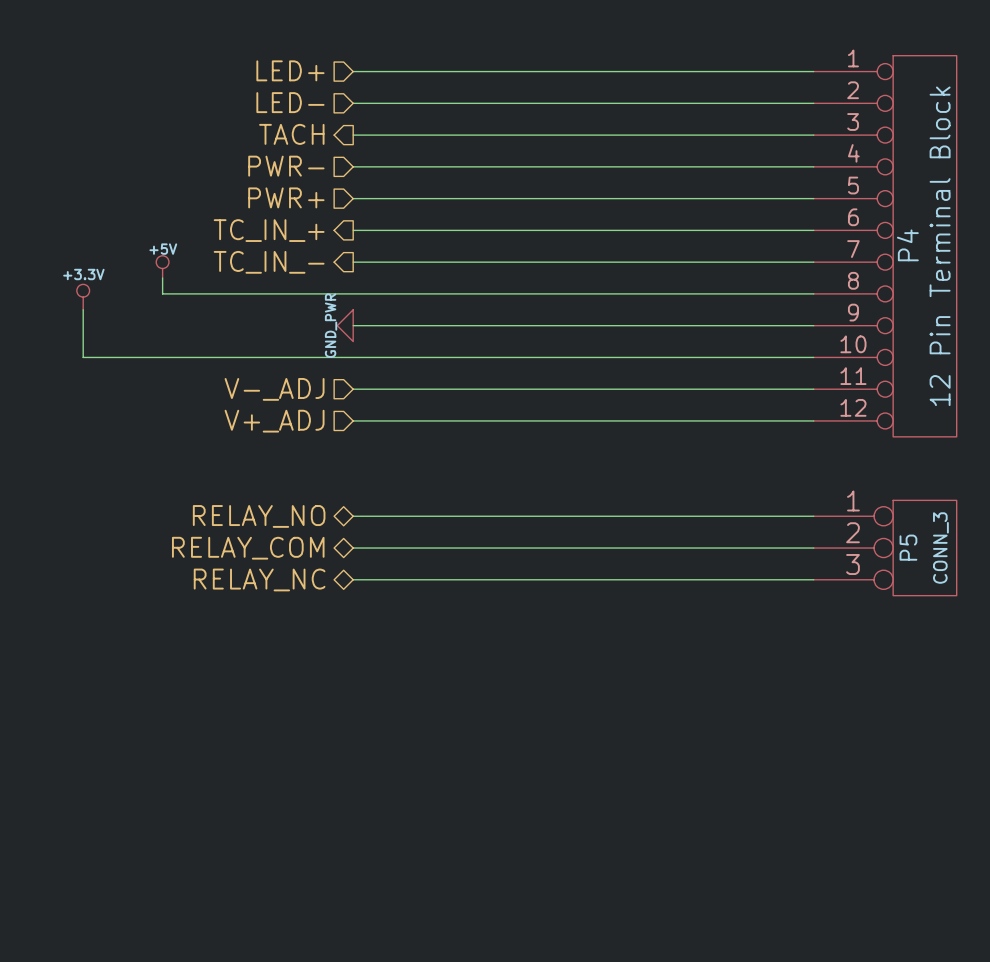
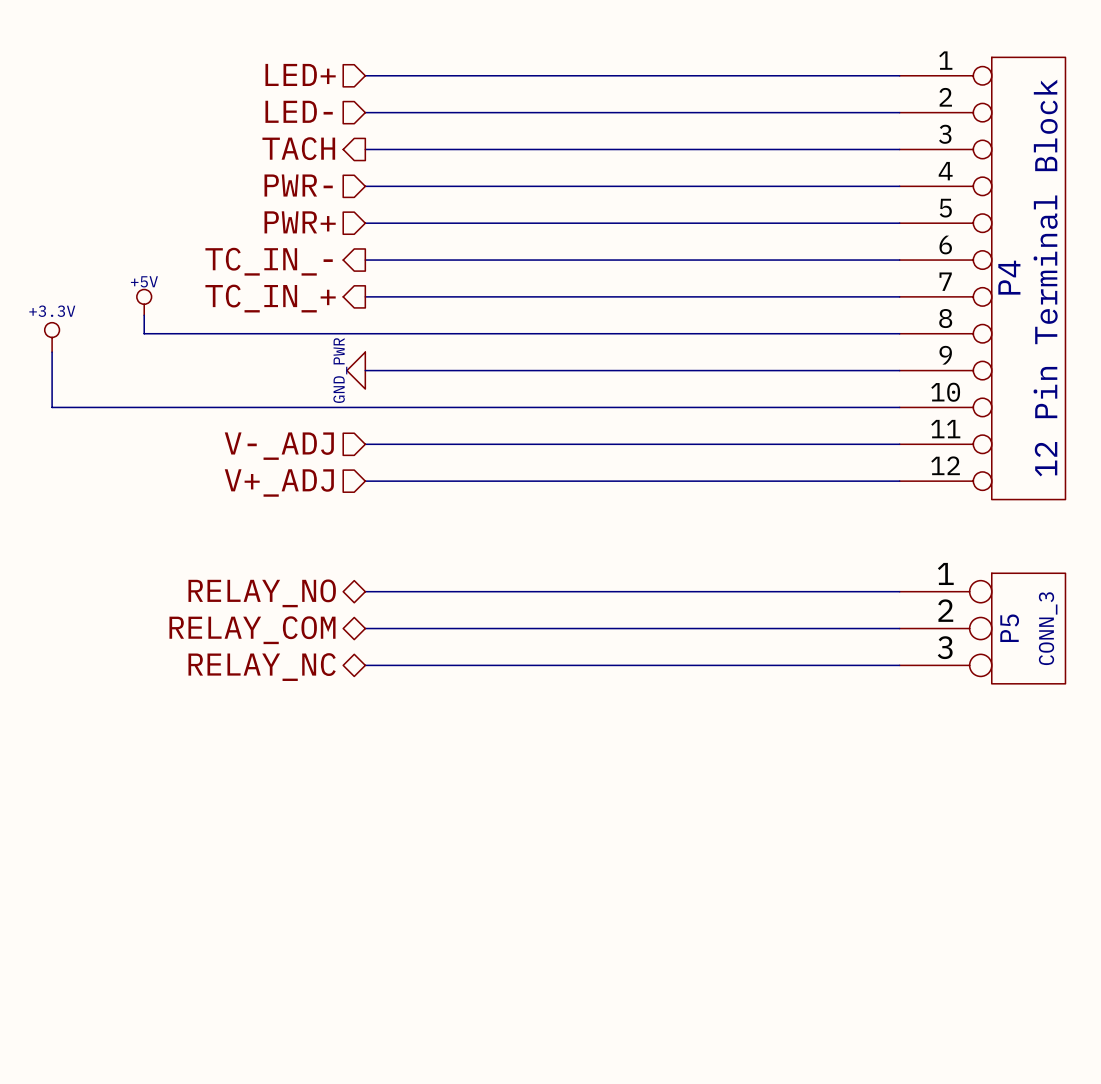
hierarchical label: TC_IN_+ (269, 230) -> TC_IN_- (269, 261)
hierarchical label: TC_IN_- (269, 262) -> TC_IN_+ (270, 298)

